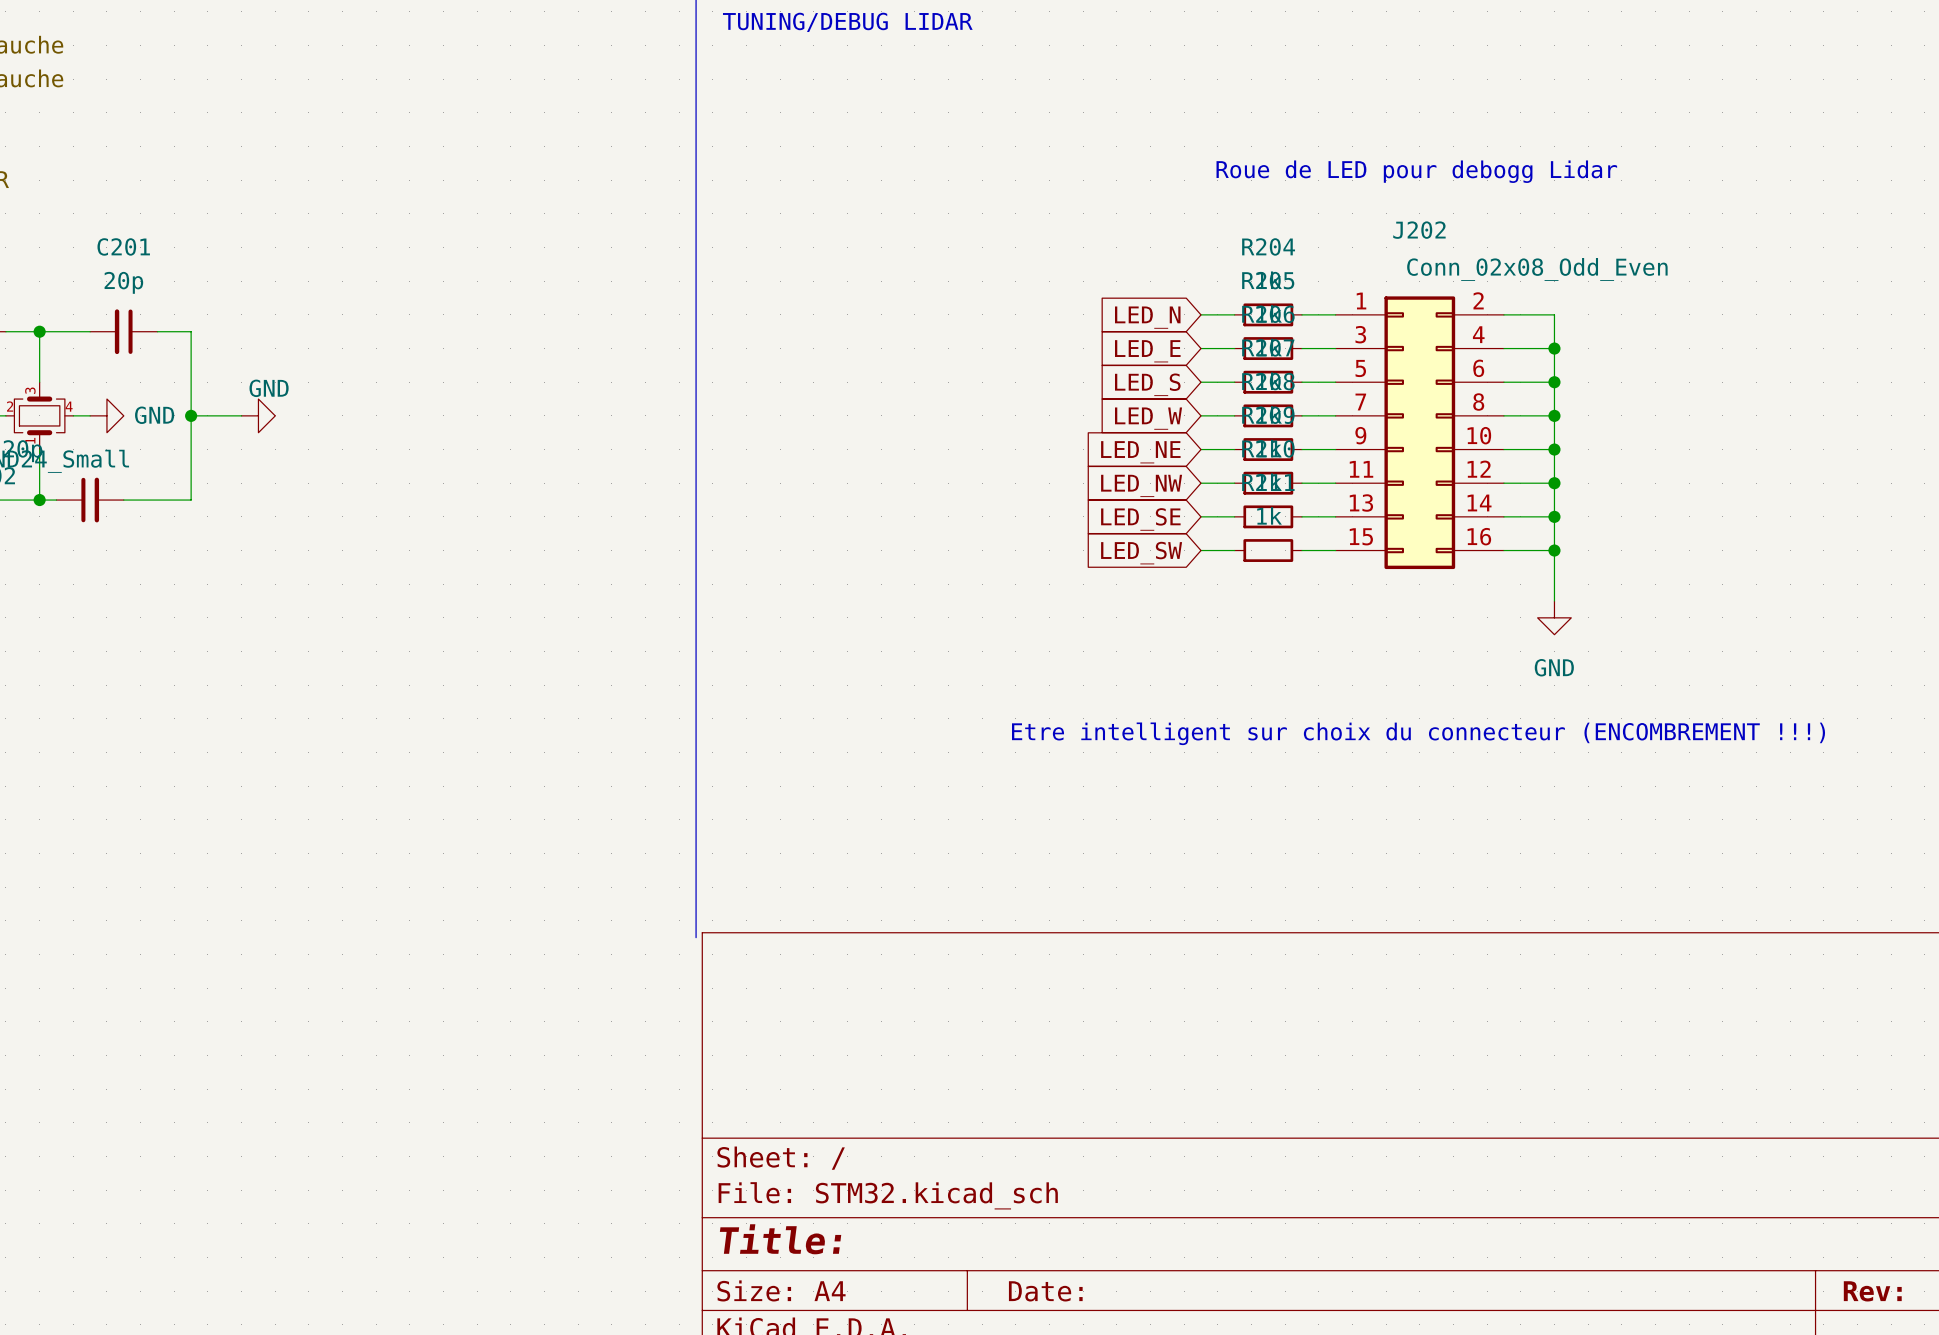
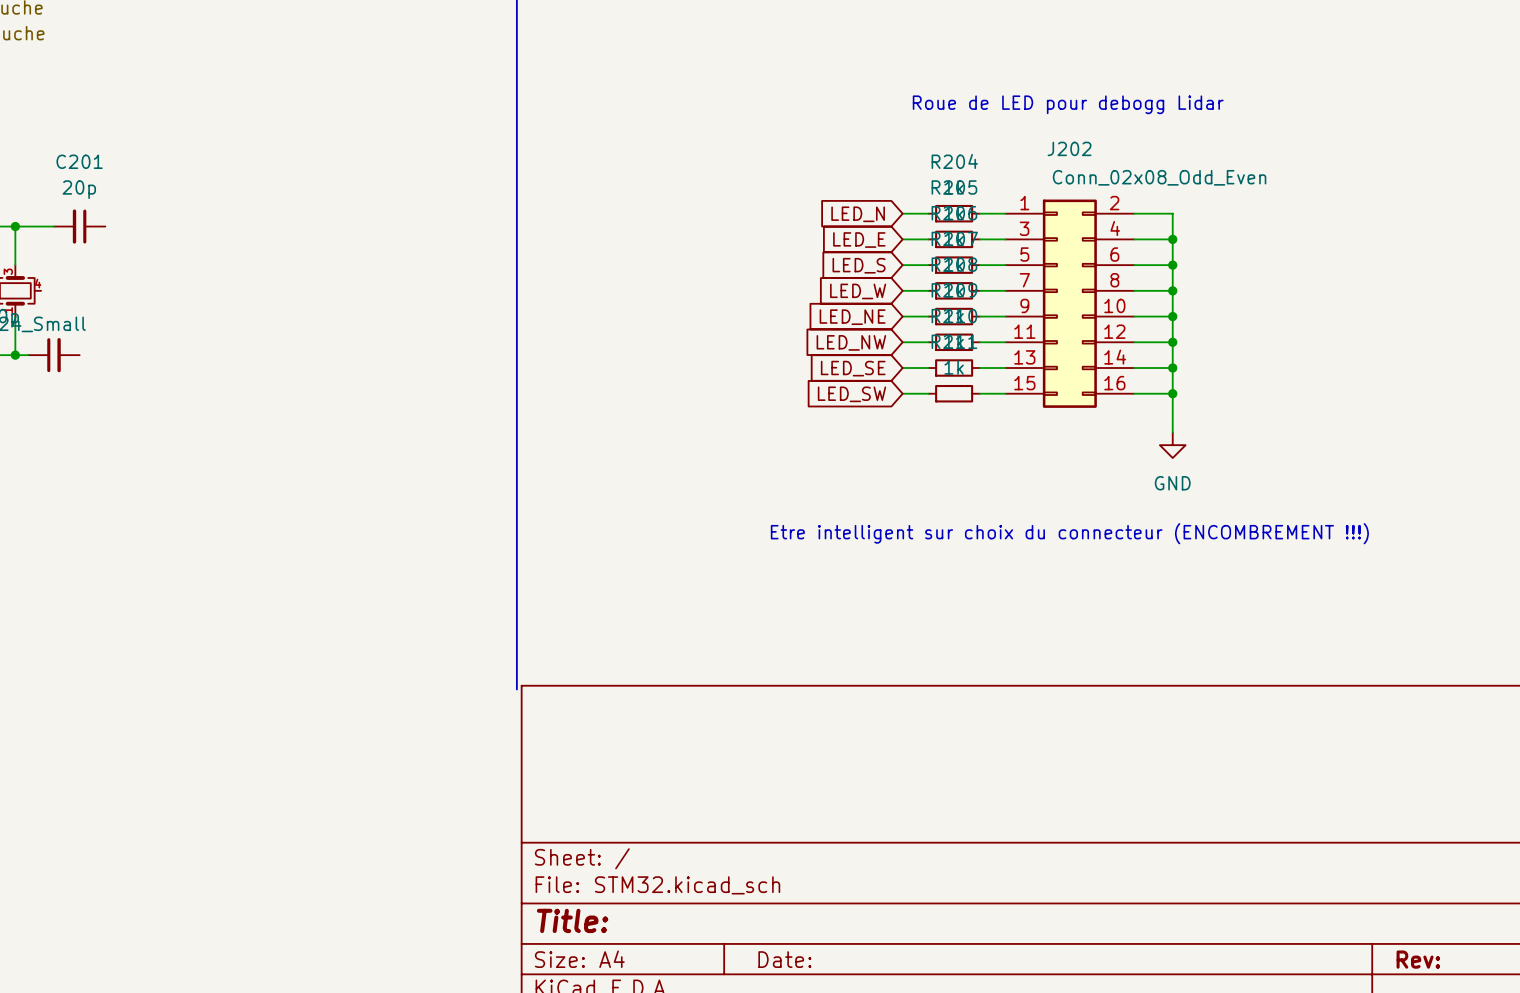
wire: (157, 331) (191, 331) (191, 500) (123, 500) -> none
wire: (73, 415) (90, 415) -> none
power symbol: GND (106, 415) -> none
wire: (191, 415) (241, 415) -> none
junction: (191, 415) -> none
power symbol: GND (258, 415) -> none

